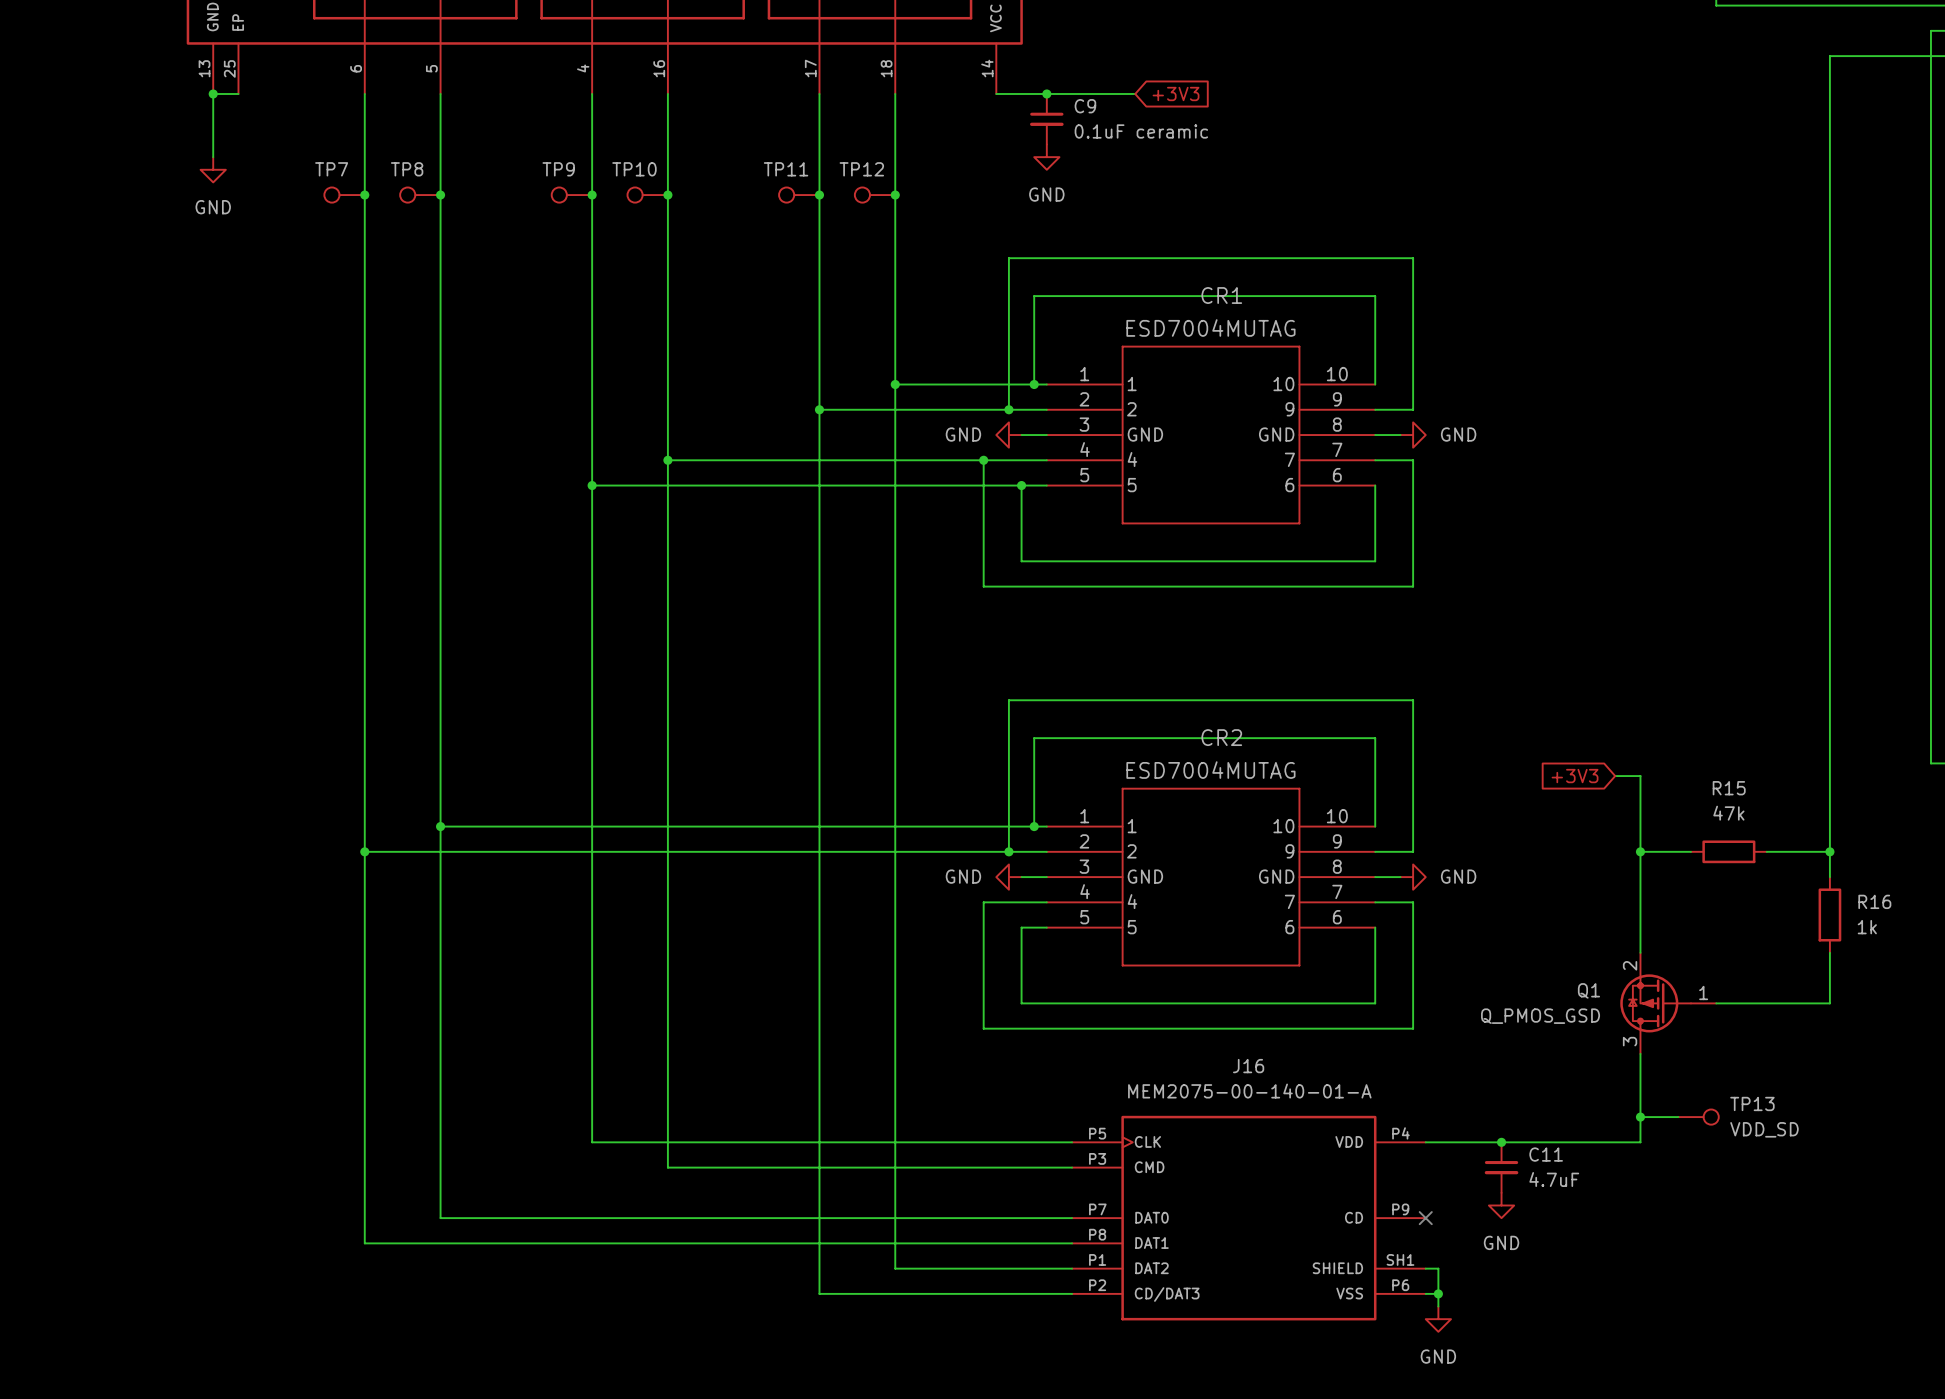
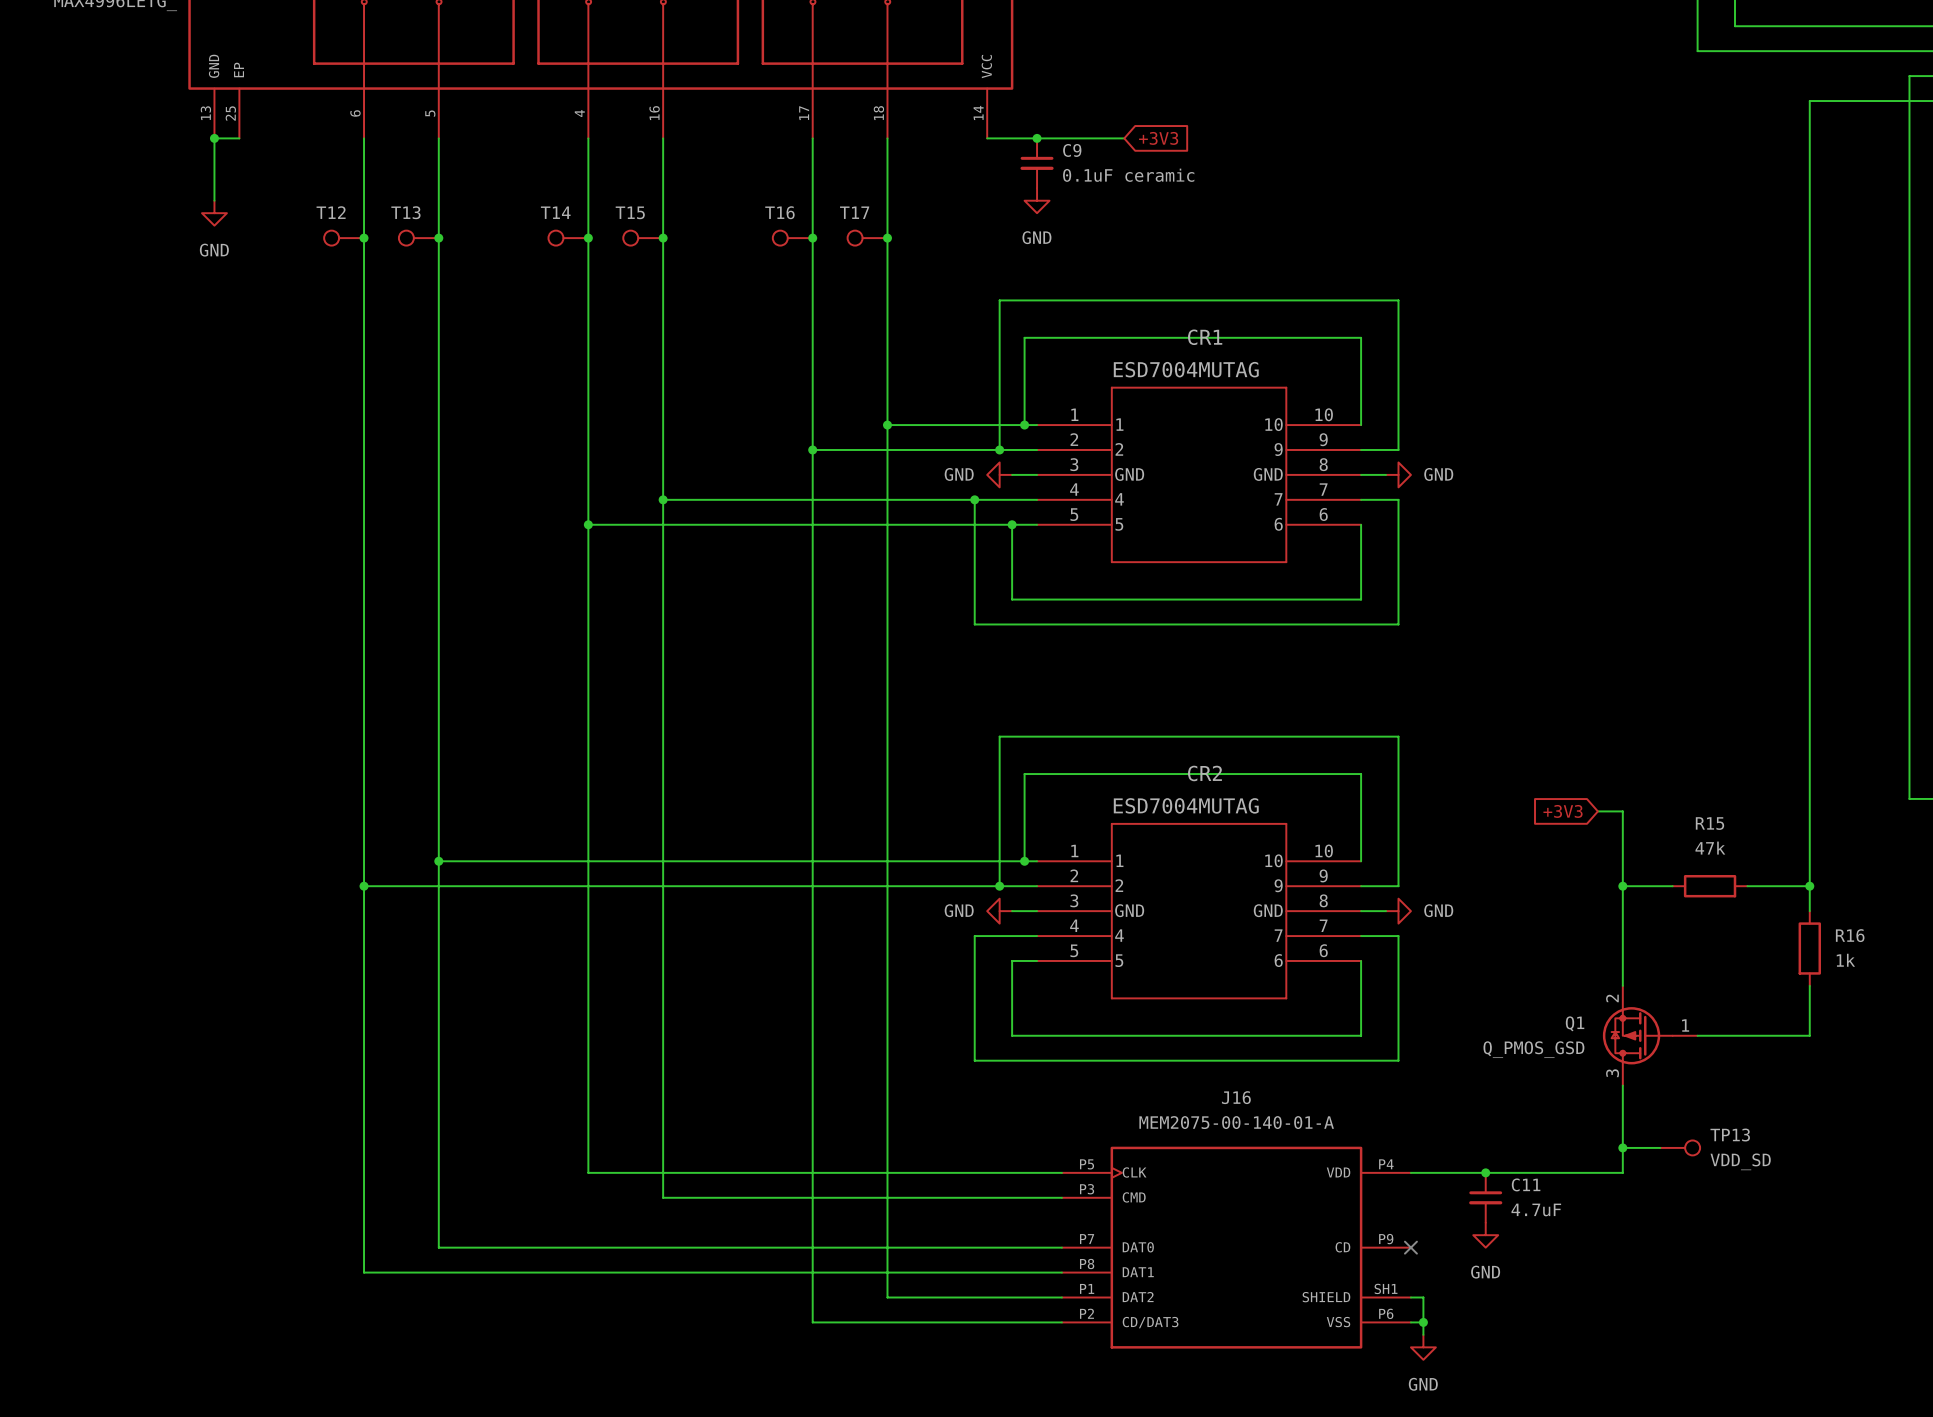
TP7 name: TP7 (331, 169) -> T12 (331, 212)
TP8 name: TP8 (407, 169) -> T13 (405, 212)
TP9 name: TP9 (558, 169) -> T14 (555, 212)
TP10 name: TP10 (634, 169) -> T15 (630, 212)
TP11 name: TP11 (786, 169) -> T16 (779, 212)
TP12 name: TP12 (861, 169) -> T17 (854, 212)

